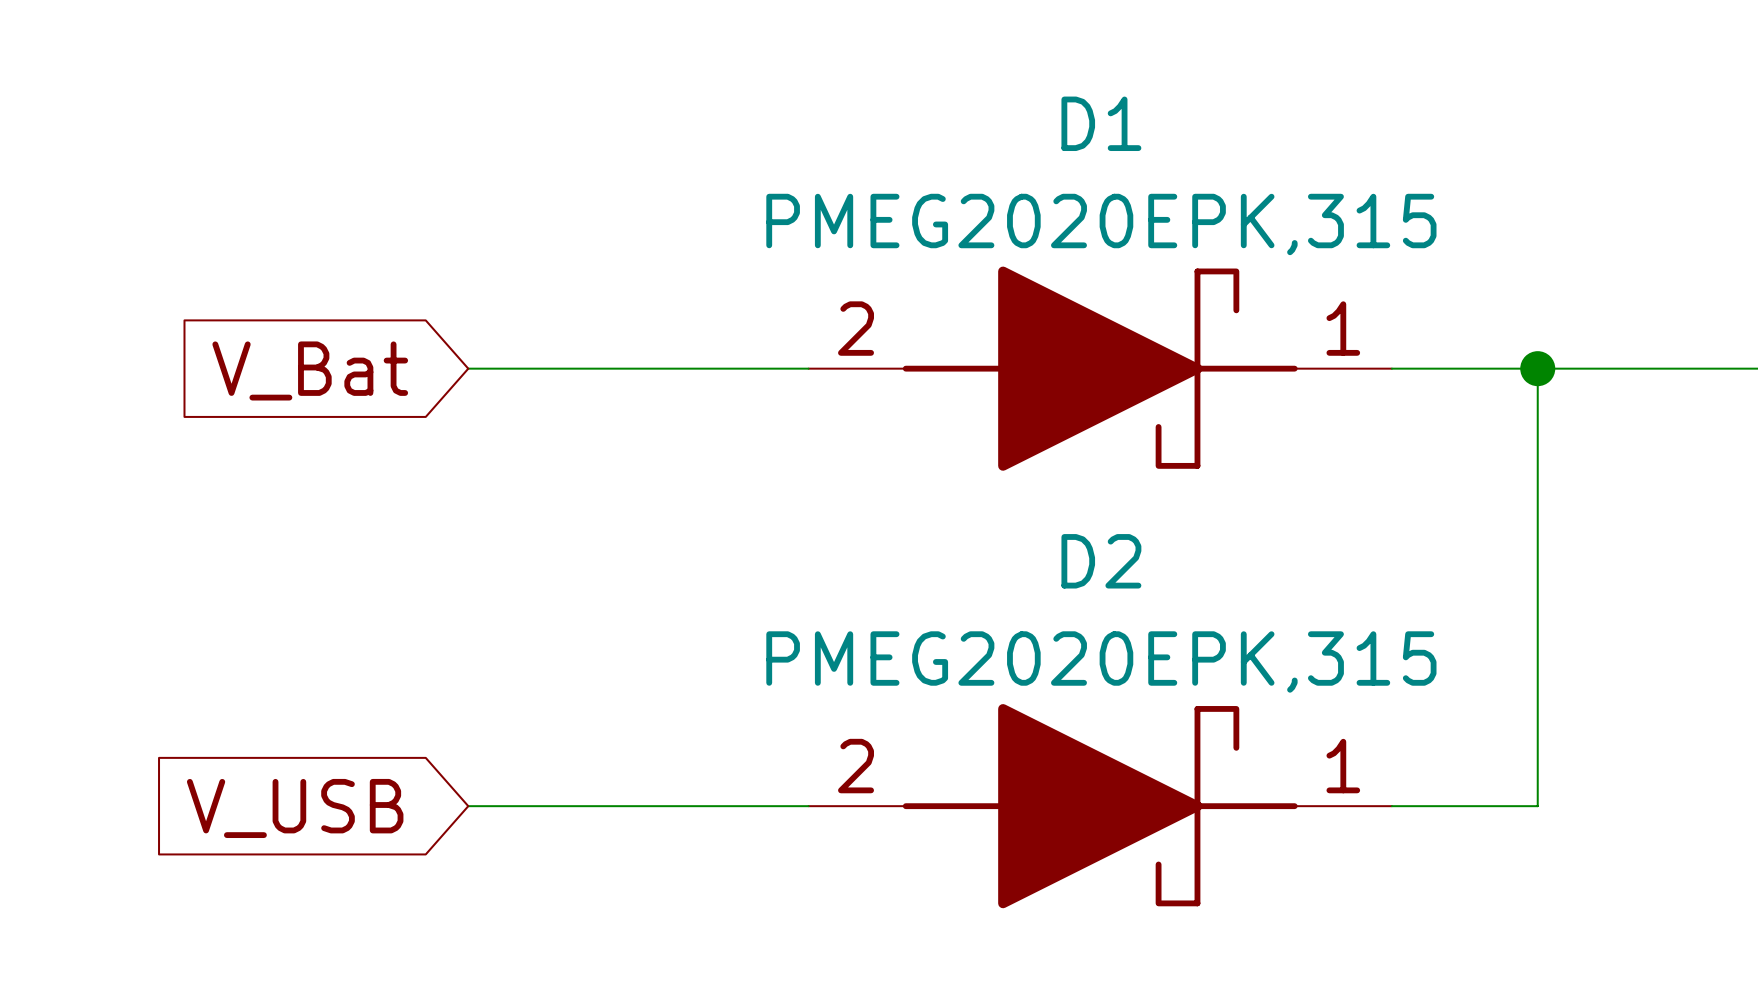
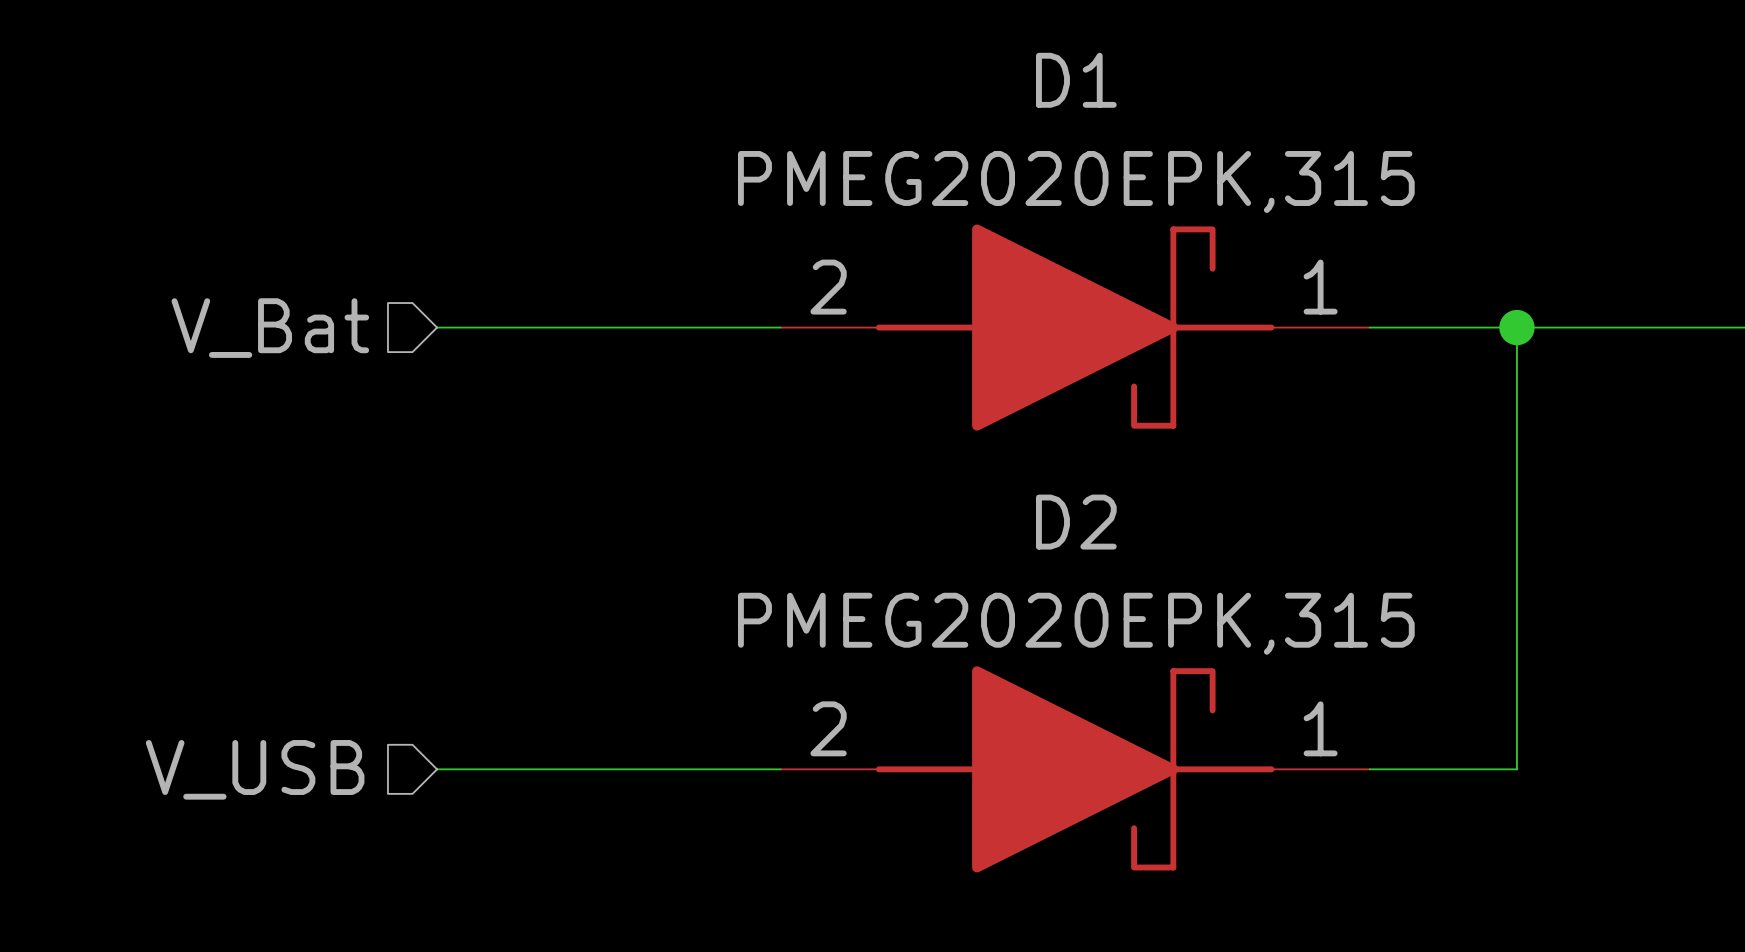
hierarchical label: none -> V_Bat (270, 328)
global label: V_Bat (310, 370) -> none
hierarchical label: none -> V_USB (255, 769)
global label: V_USB (295, 808) -> none

